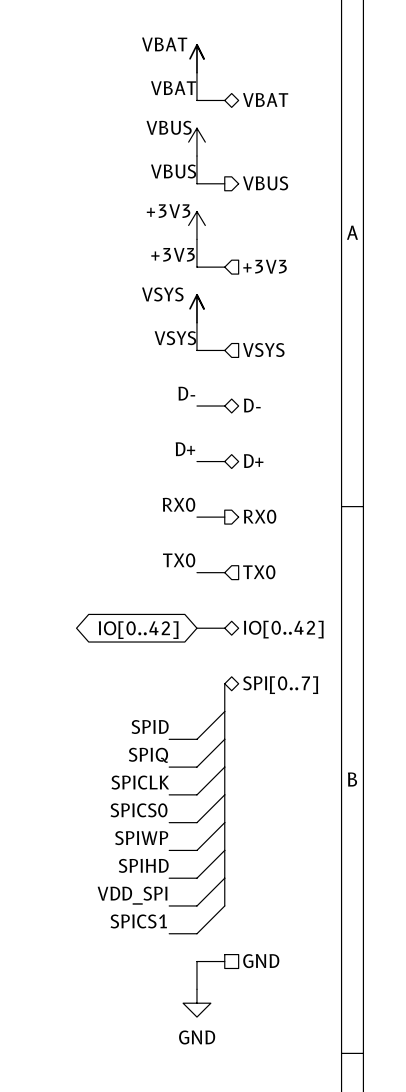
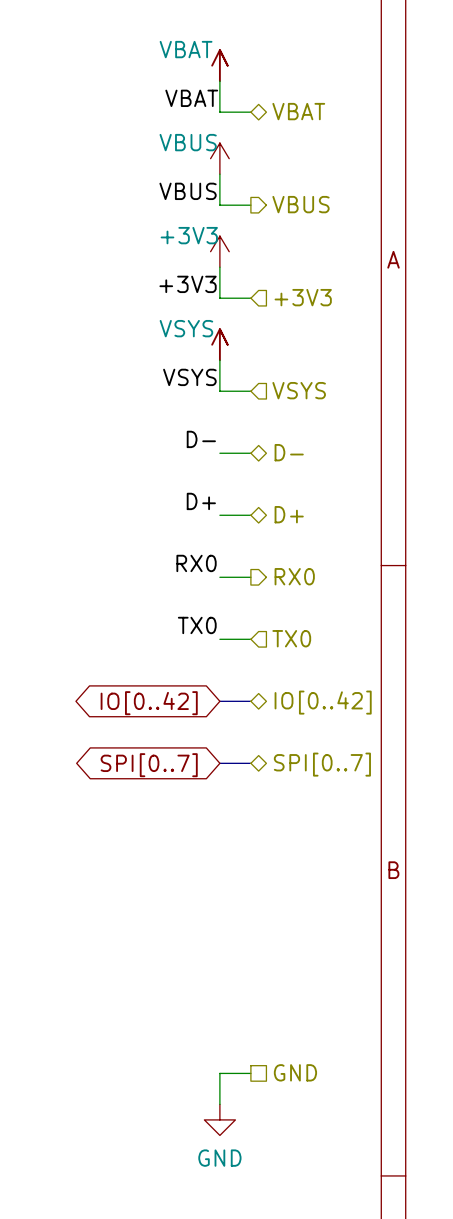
bus: (224, 683) (224, 905) -> (250, 763) (219, 763)
global label: none -> SPI[0..7] (149, 765)
wire: (224, 711) (196, 739) (169, 739) -> none
label: SPID (150, 727) -> none
wire: (224, 739) (196, 767) (169, 767) -> none
label: SPIQ (148, 755) -> none
wire: (224, 767) (196, 794) (169, 794) -> none
label: SPICLK (140, 782) -> none
wire: (224, 794) (196, 822) (169, 822) -> none
label: SPICS0 (139, 810) -> none
wire: (224, 822) (196, 850) (169, 850) -> none
label: SPIWP (141, 838) -> none
wire: (224, 850) (196, 878) (169, 878) -> none
label: SPIHD (143, 865) -> none
wire: (224, 878) (196, 905) (169, 905) -> none
label: VDD_SPI (132, 895) -> none
wire: (224, 905) (196, 933) (169, 933) -> none
label: SPICS1 (138, 921) -> none

